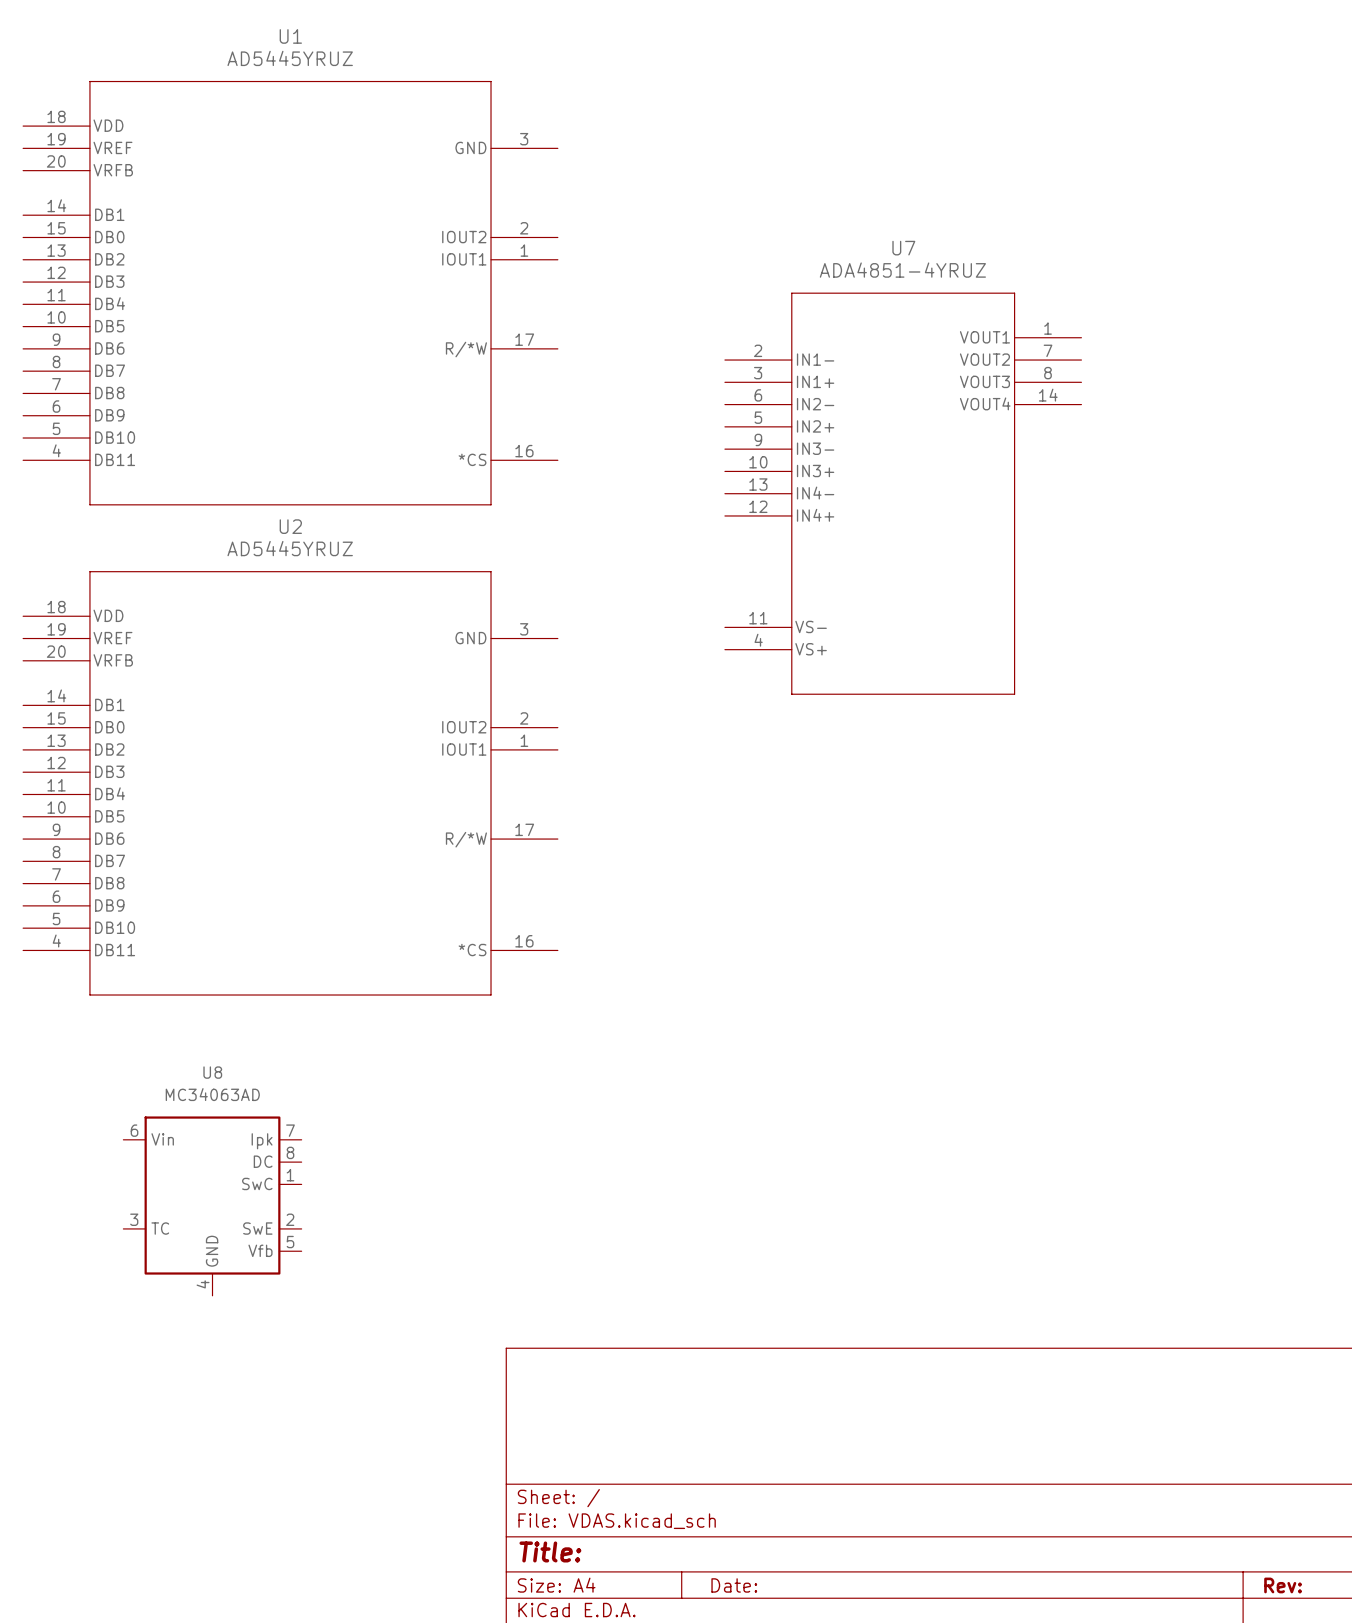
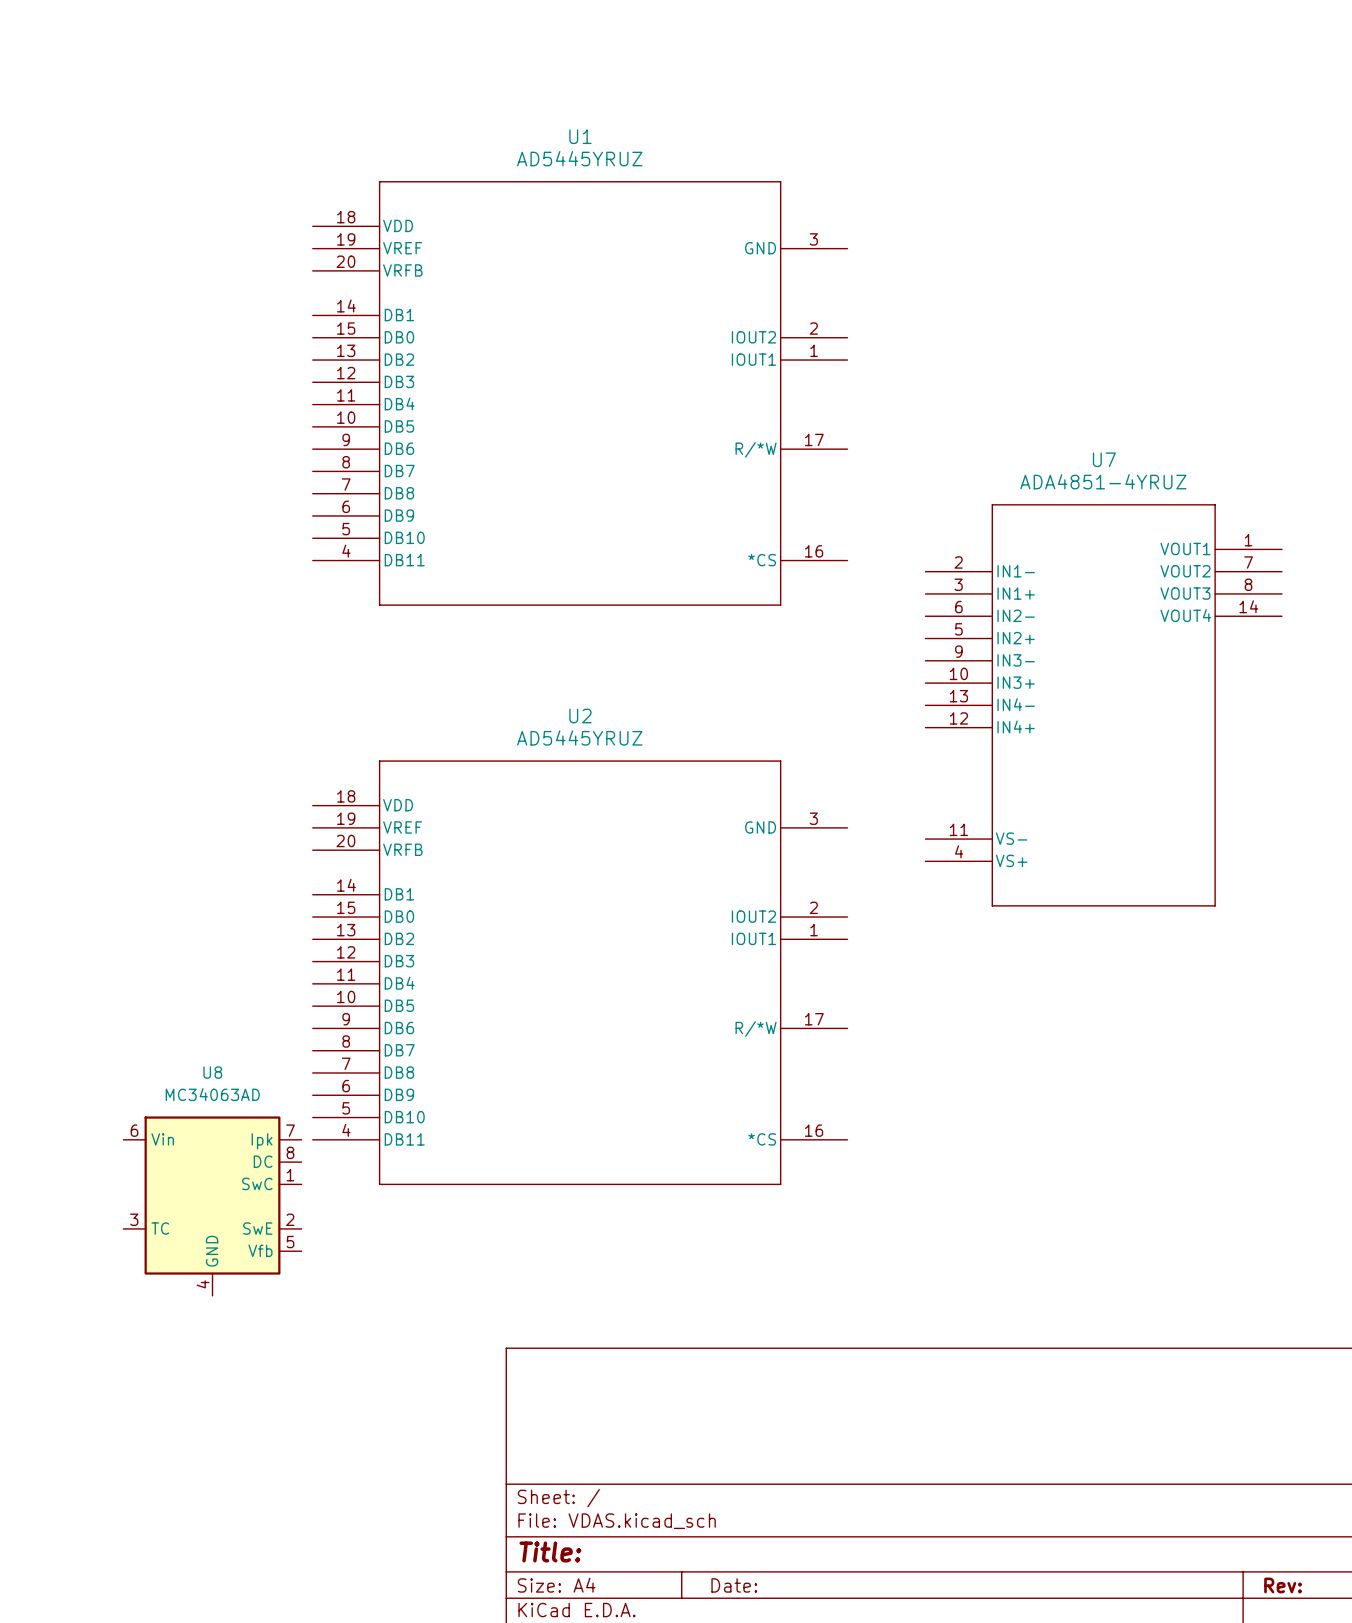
U1 position: (290, 293) -> (580, 393)
U7 position: (903, 493) -> (1103, 705)
U2 position: (290, 783) -> (580, 972)

